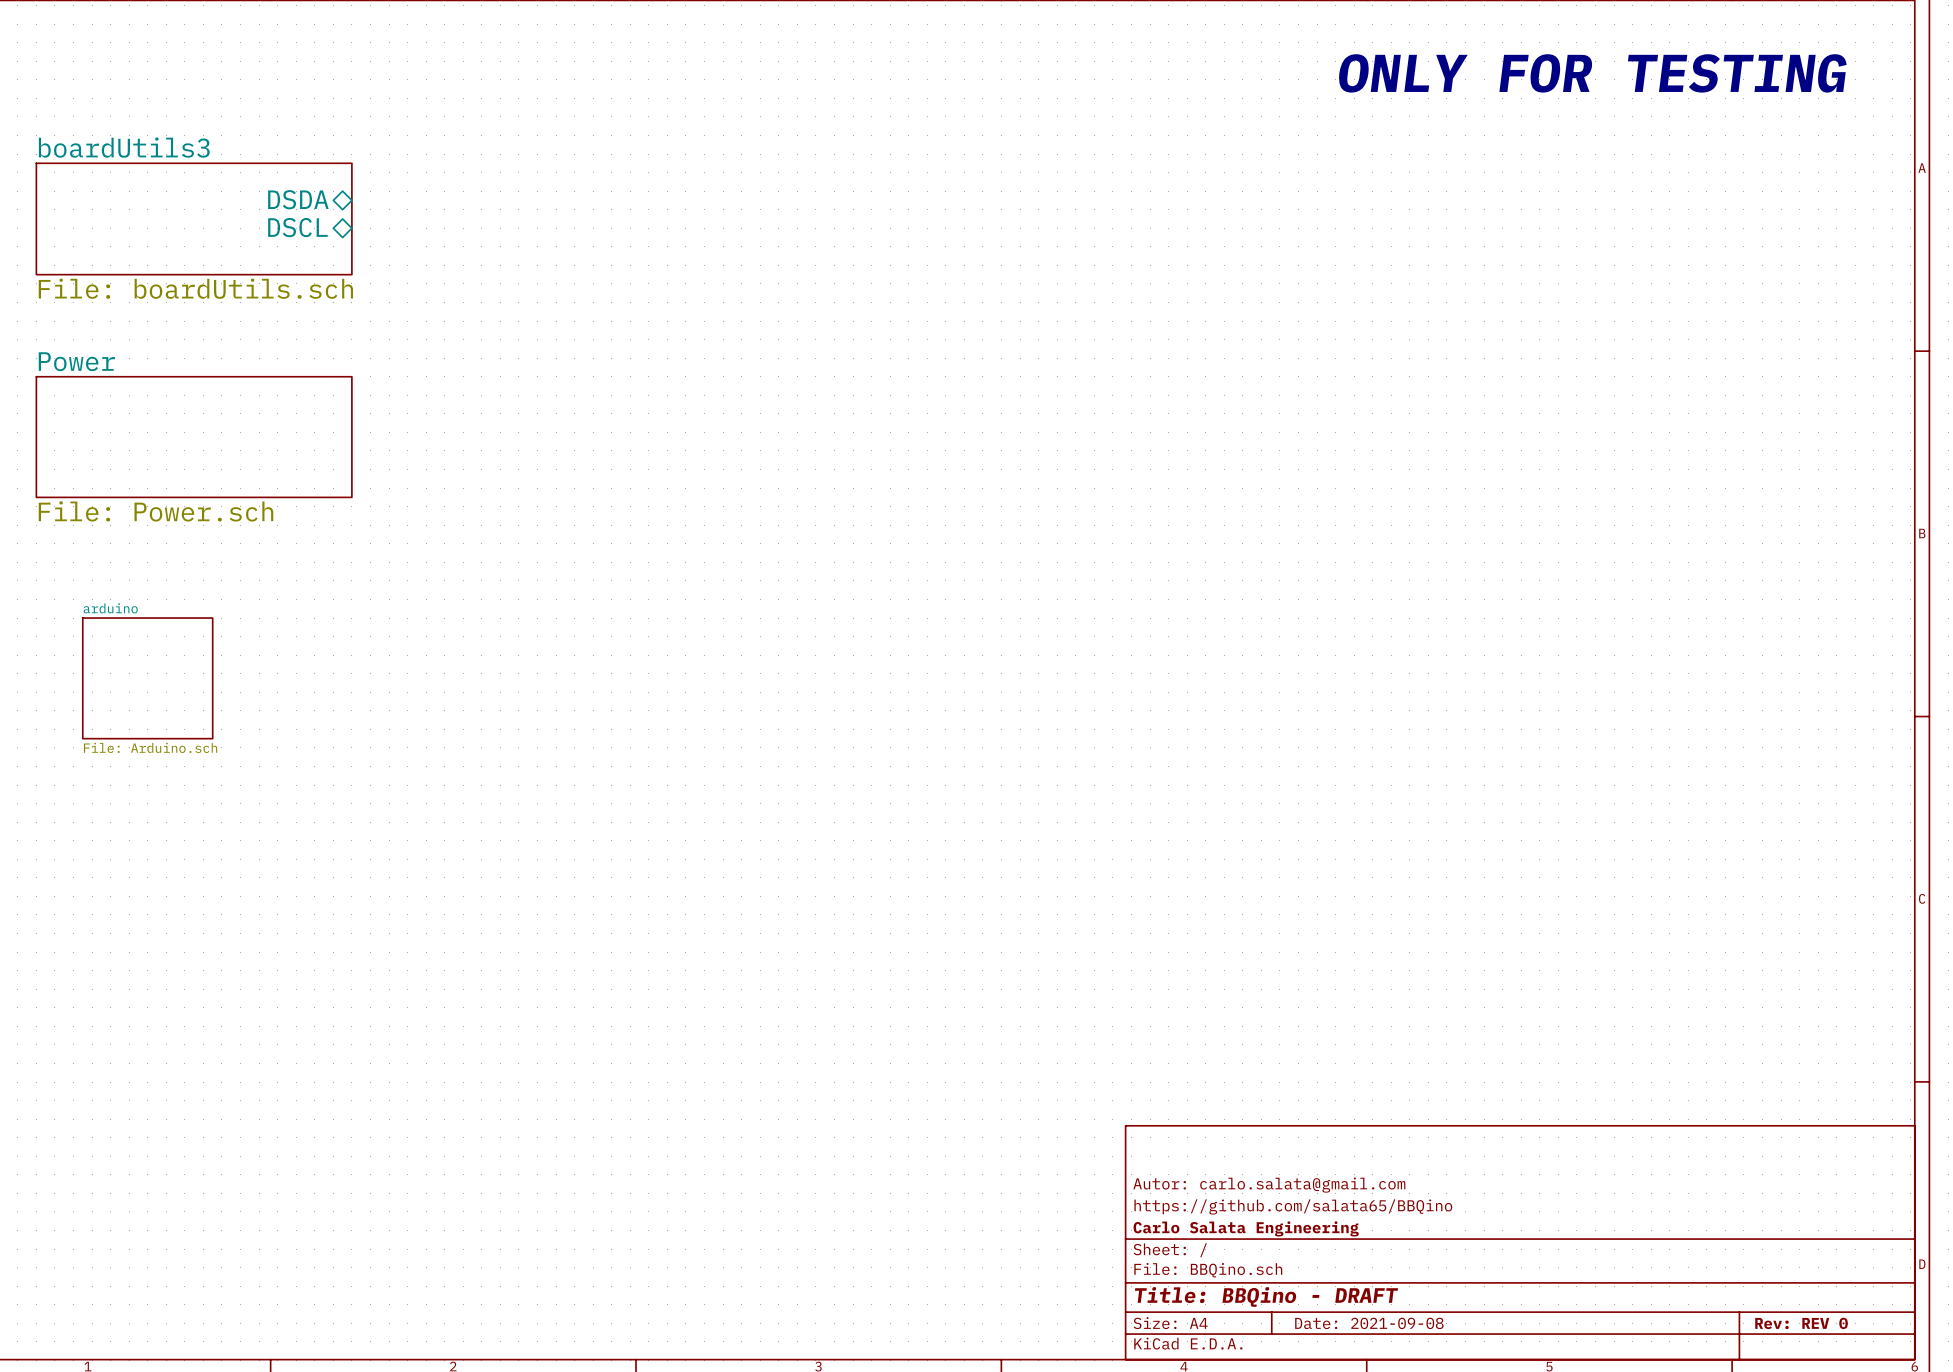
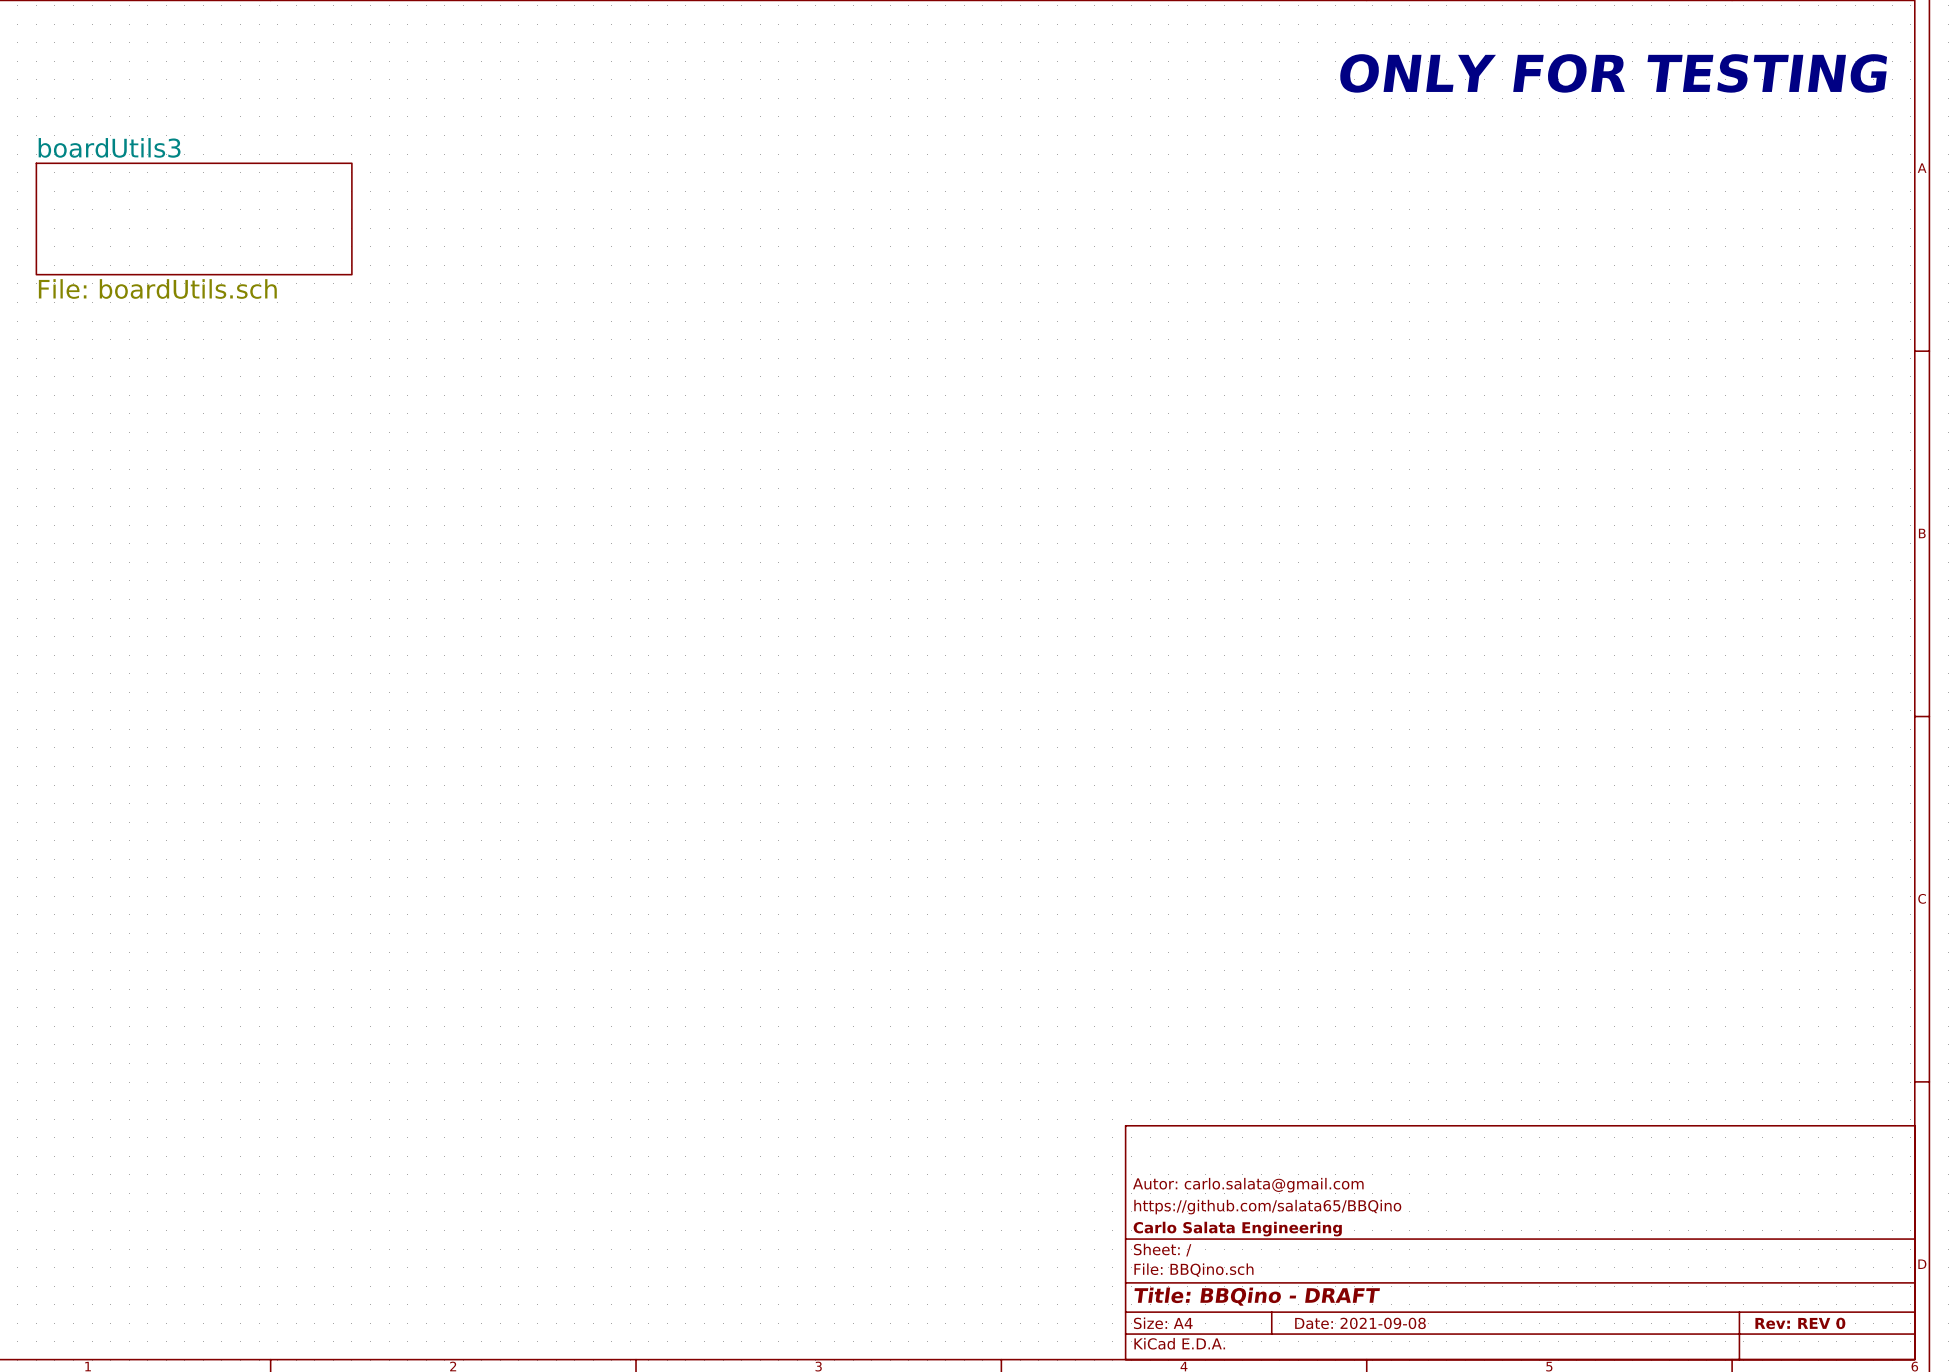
sheet pin: DSDA (298, 199) -> none
sheet pin: DSCL (297, 227) -> none
sheet Power: File: Power.sch (194, 437) -> none
sheet arduino: File: Arduino.sch (147, 678) -> none

